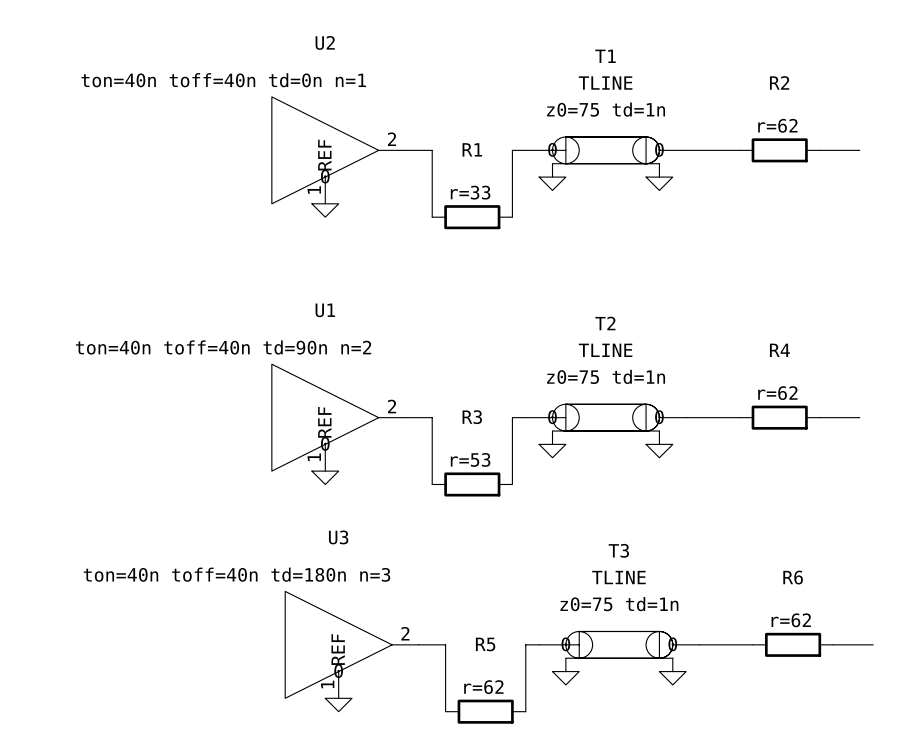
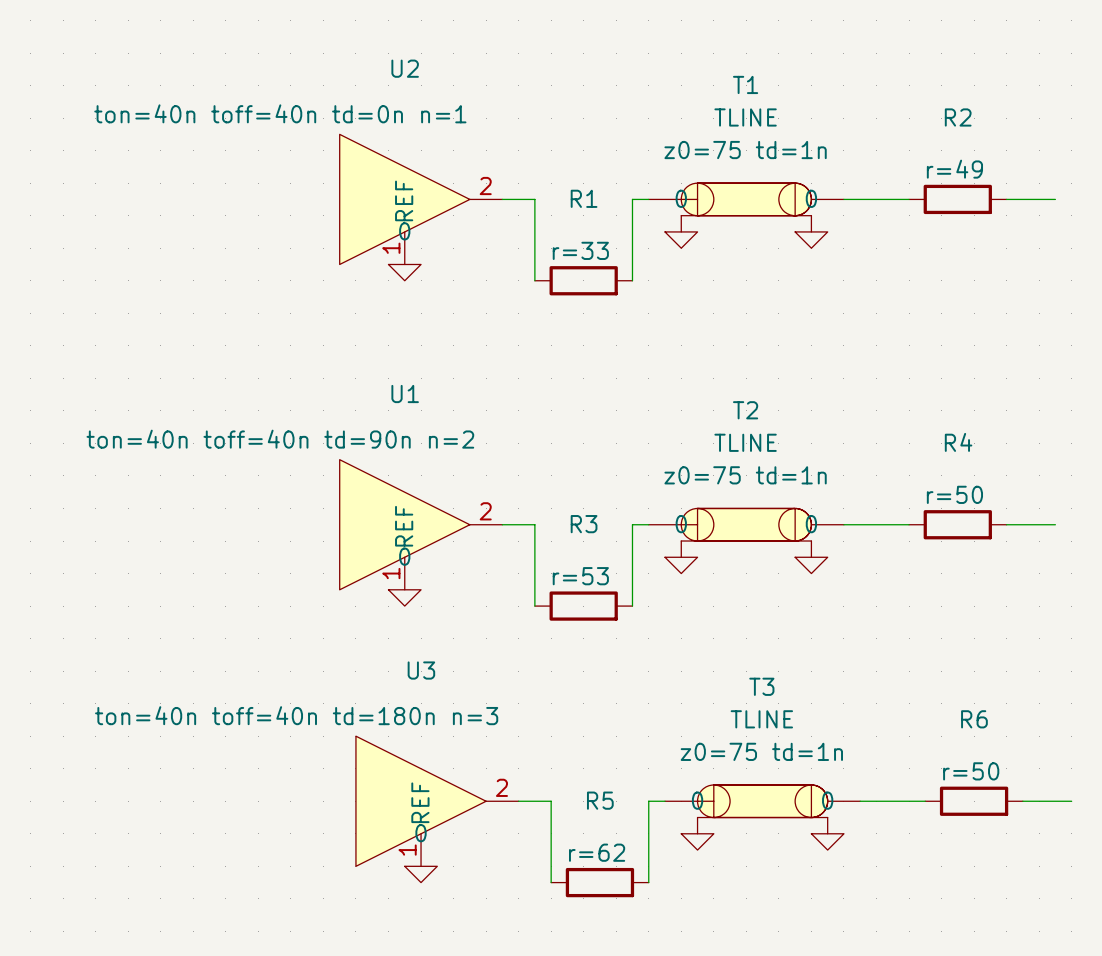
R2 text: r=62 (777, 125) -> r=49 (954, 169)
R4 text: r=62 (777, 393) -> r=50 (954, 494)
R6 text: r=62 (791, 620) -> r=50 (971, 771)

